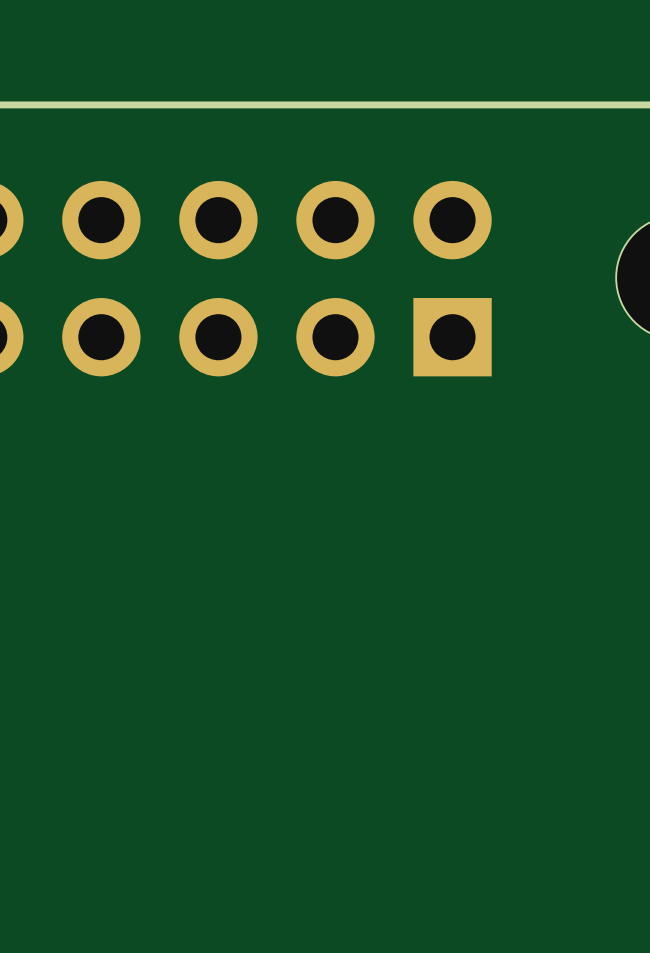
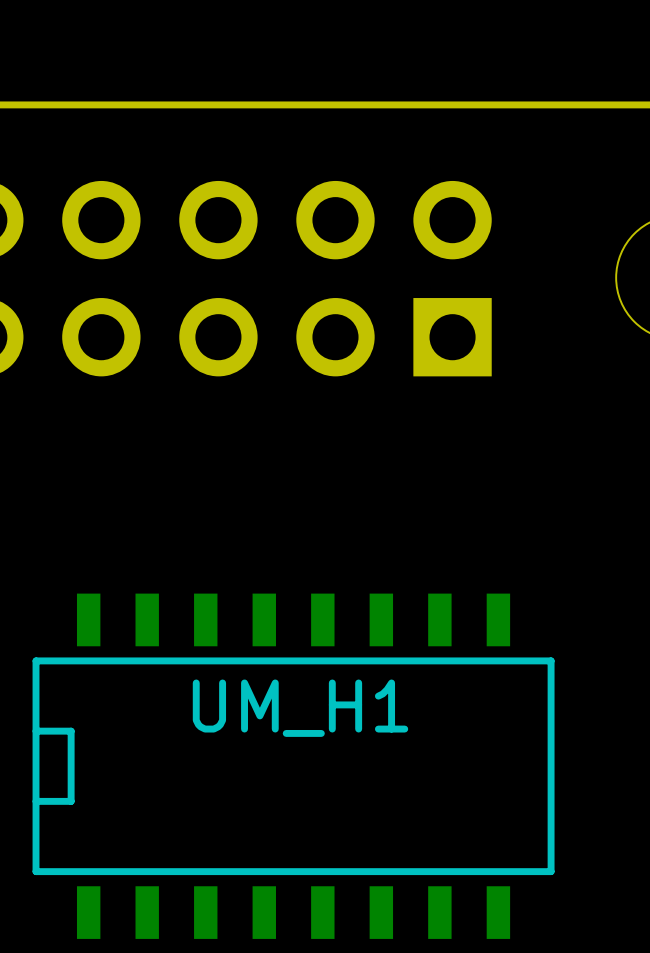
UM_H1: none -> (293, 766)

